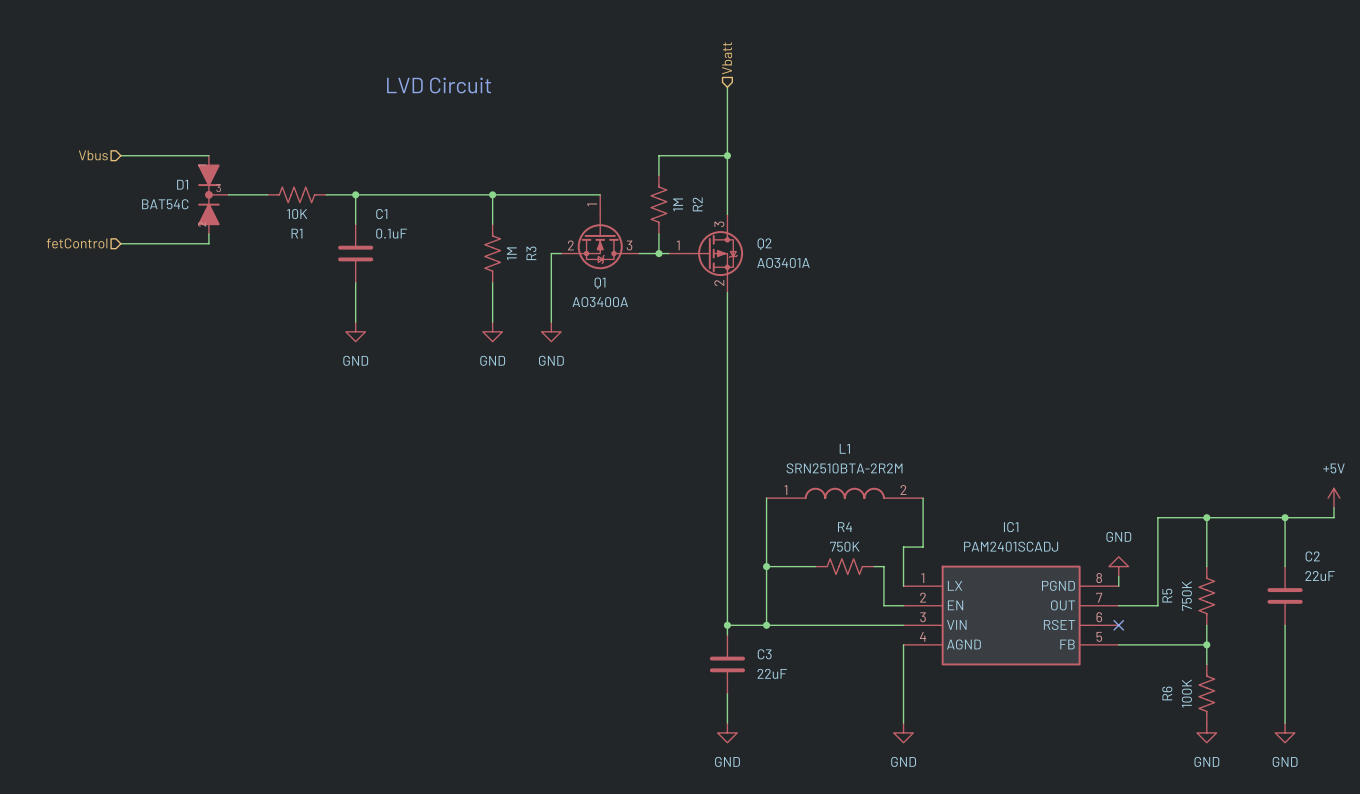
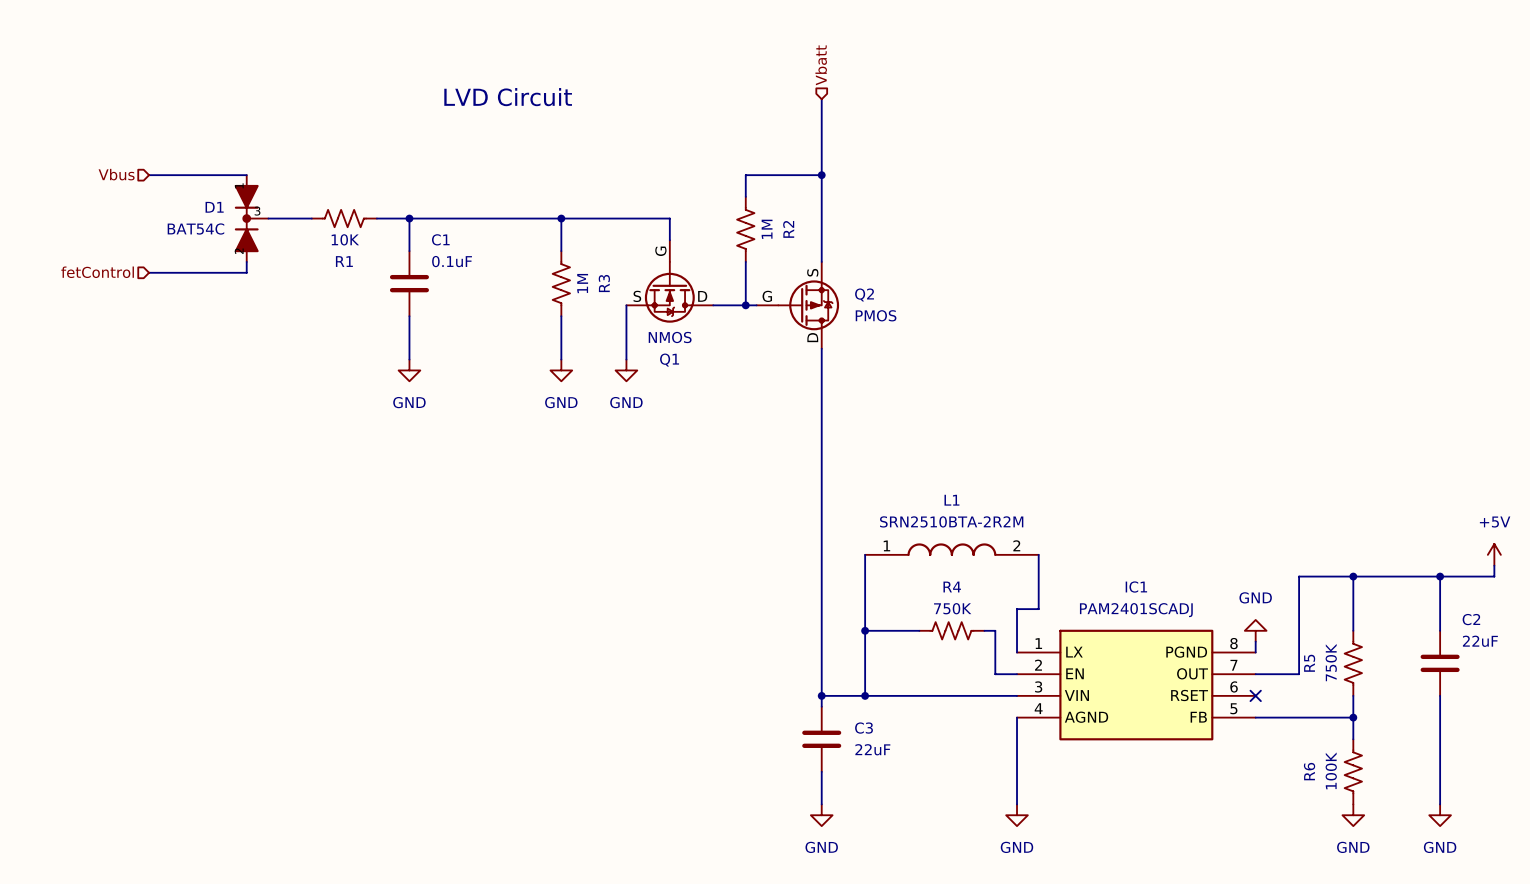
wire: (590, 194) (600, 194) -> (669, 218) (669, 240)
Q1 pin number: 1 (592, 204) -> none
Q2 symbol: [668, 214, 744, 293] -> [756, 261, 840, 349]
Q1 pin name: none -> G (660, 251)
Q1 position: (600, 232) -> (669, 281)
Q1 pin number: 2 (570, 245) -> none
Q1 pin number: 3 (629, 245) -> none
wire: (561, 253) (551, 253) (551, 273) -> none
wire: (639, 253) (668, 253) -> none
wire: none -> (745, 283) (745, 305)
junction position: (658, 253) -> (745, 305)
Q2 value: AO3401A (783, 262) -> PMOS (876, 315)
Q1 pin name: none -> S (637, 296)
Q1 pin name: none -> D (702, 296)
wire: none -> (713, 305) (756, 305)
Q1 name position: Q1 (600, 283) -> Q1 (669, 360)
Q1 value: AO3400A (600, 302) -> NMOS (670, 337)

